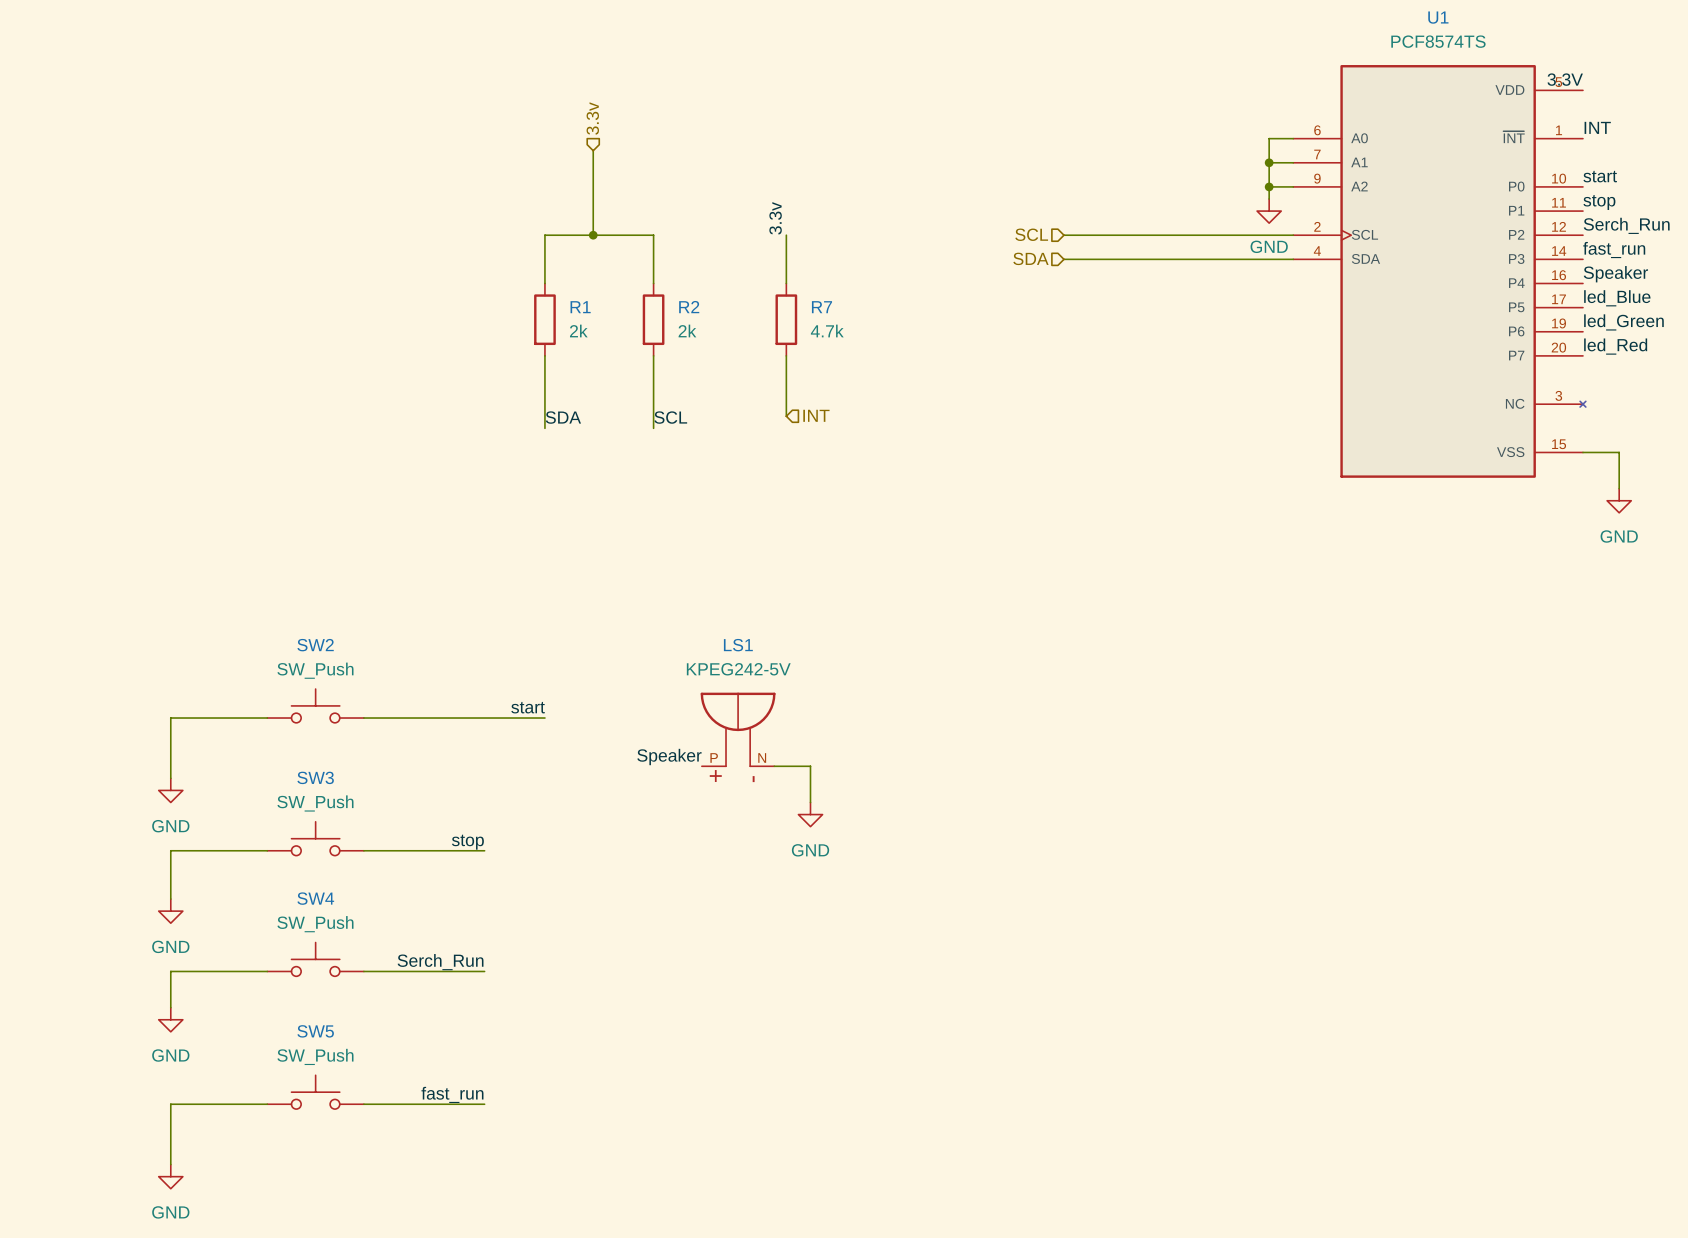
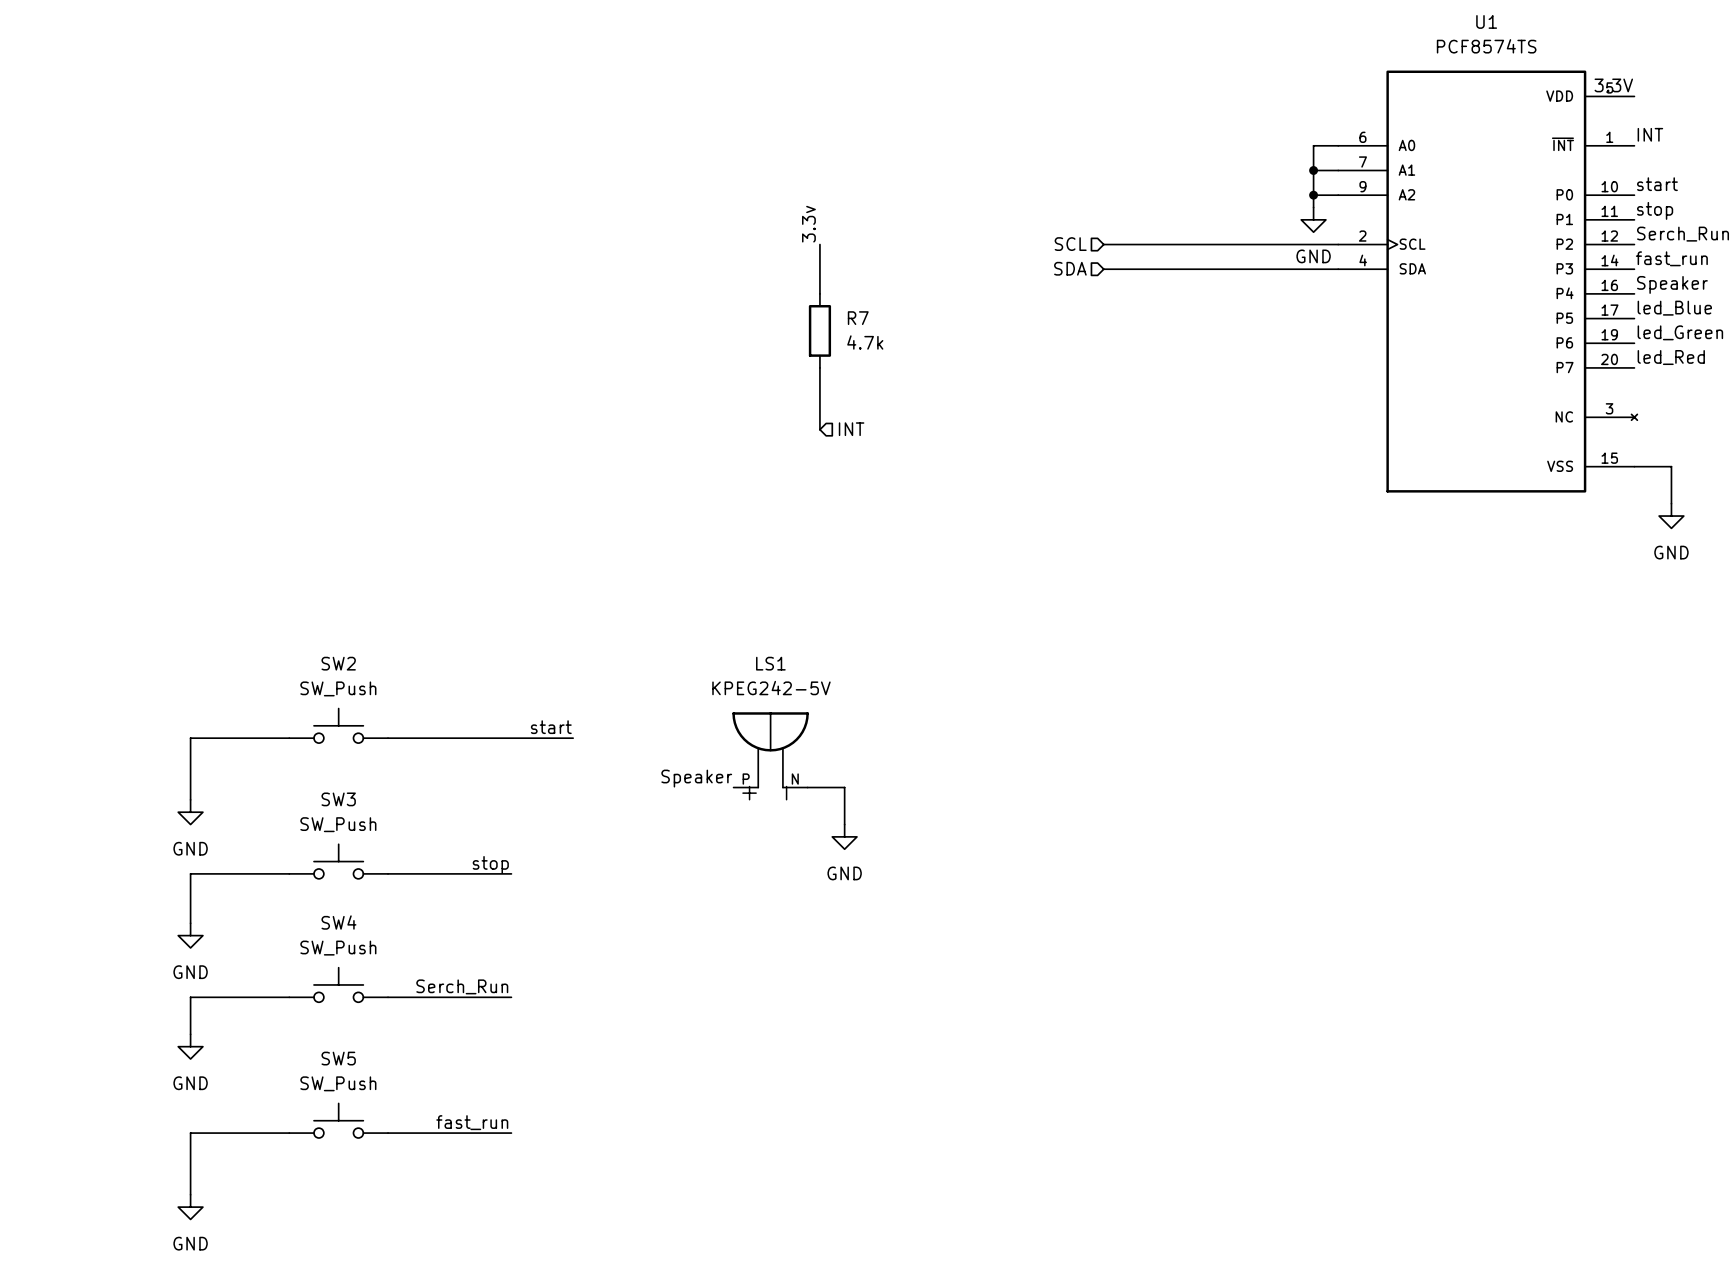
hierarchical label: 3.3v (592, 118) -> none
wire: (593, 150) (593, 235) -> none
junction: (593, 235) -> none
wire: (544, 283) (544, 235) (653, 235) (653, 283) -> none
R1: 2k (544, 319) -> none
R2: 2k (653, 319) -> none
wire: (544, 355) (544, 428) -> none
wire: (653, 355) (653, 428) -> none
label: SDA (563, 417) -> none
label: SCL (670, 417) -> none

